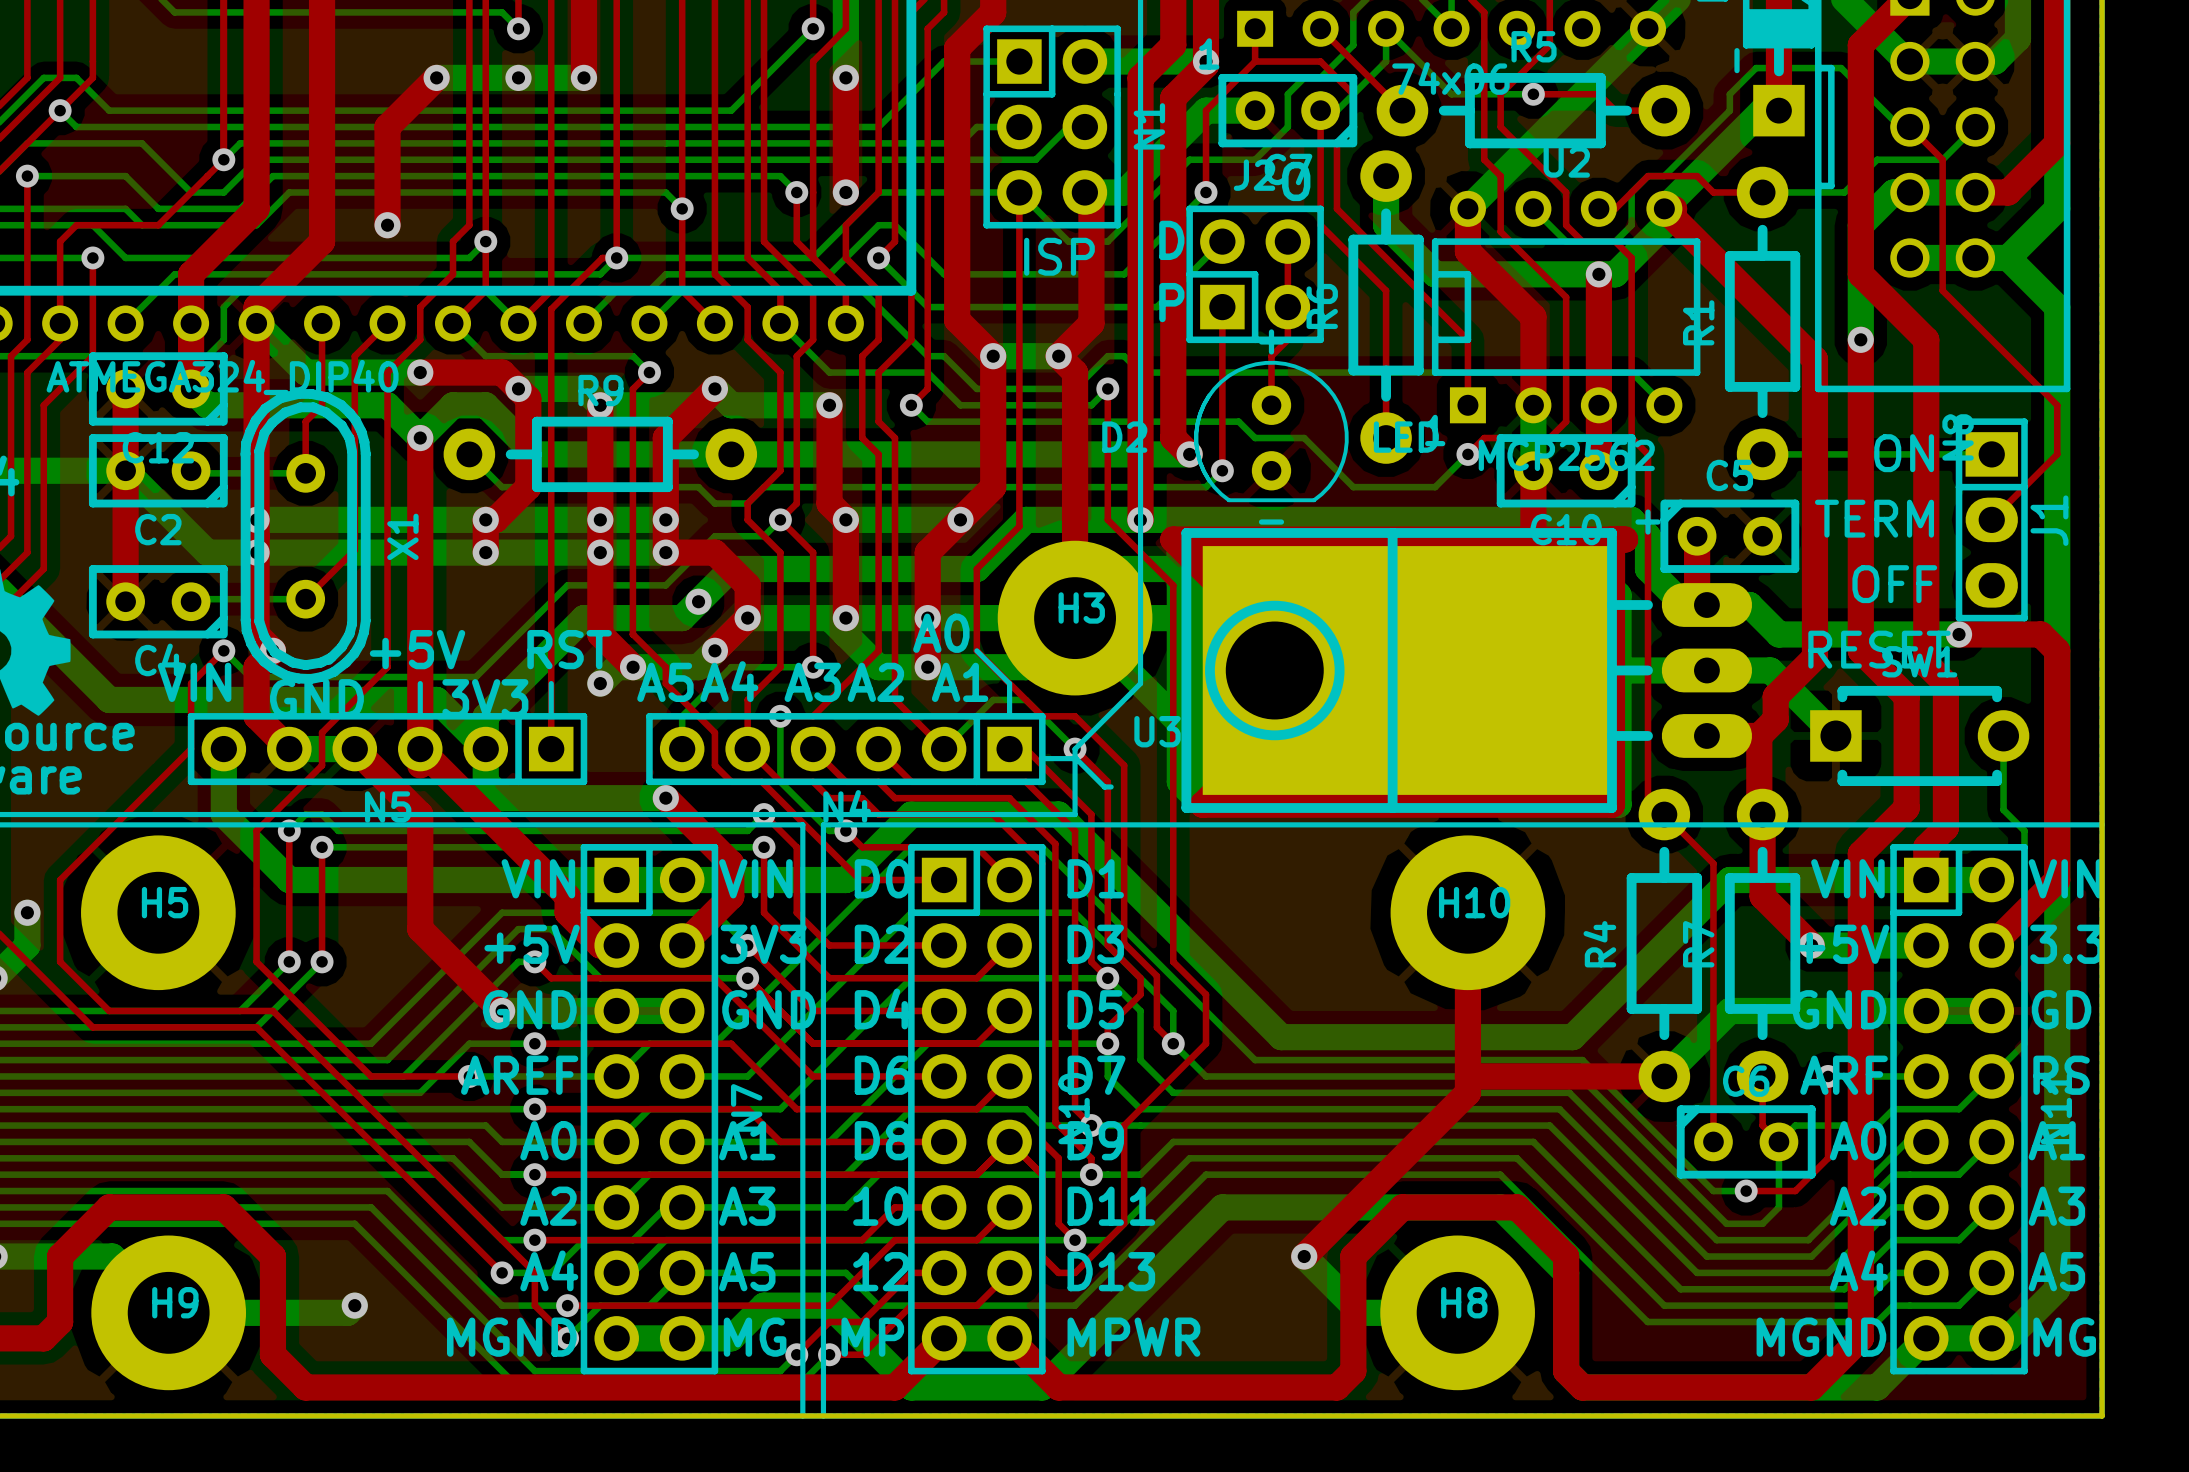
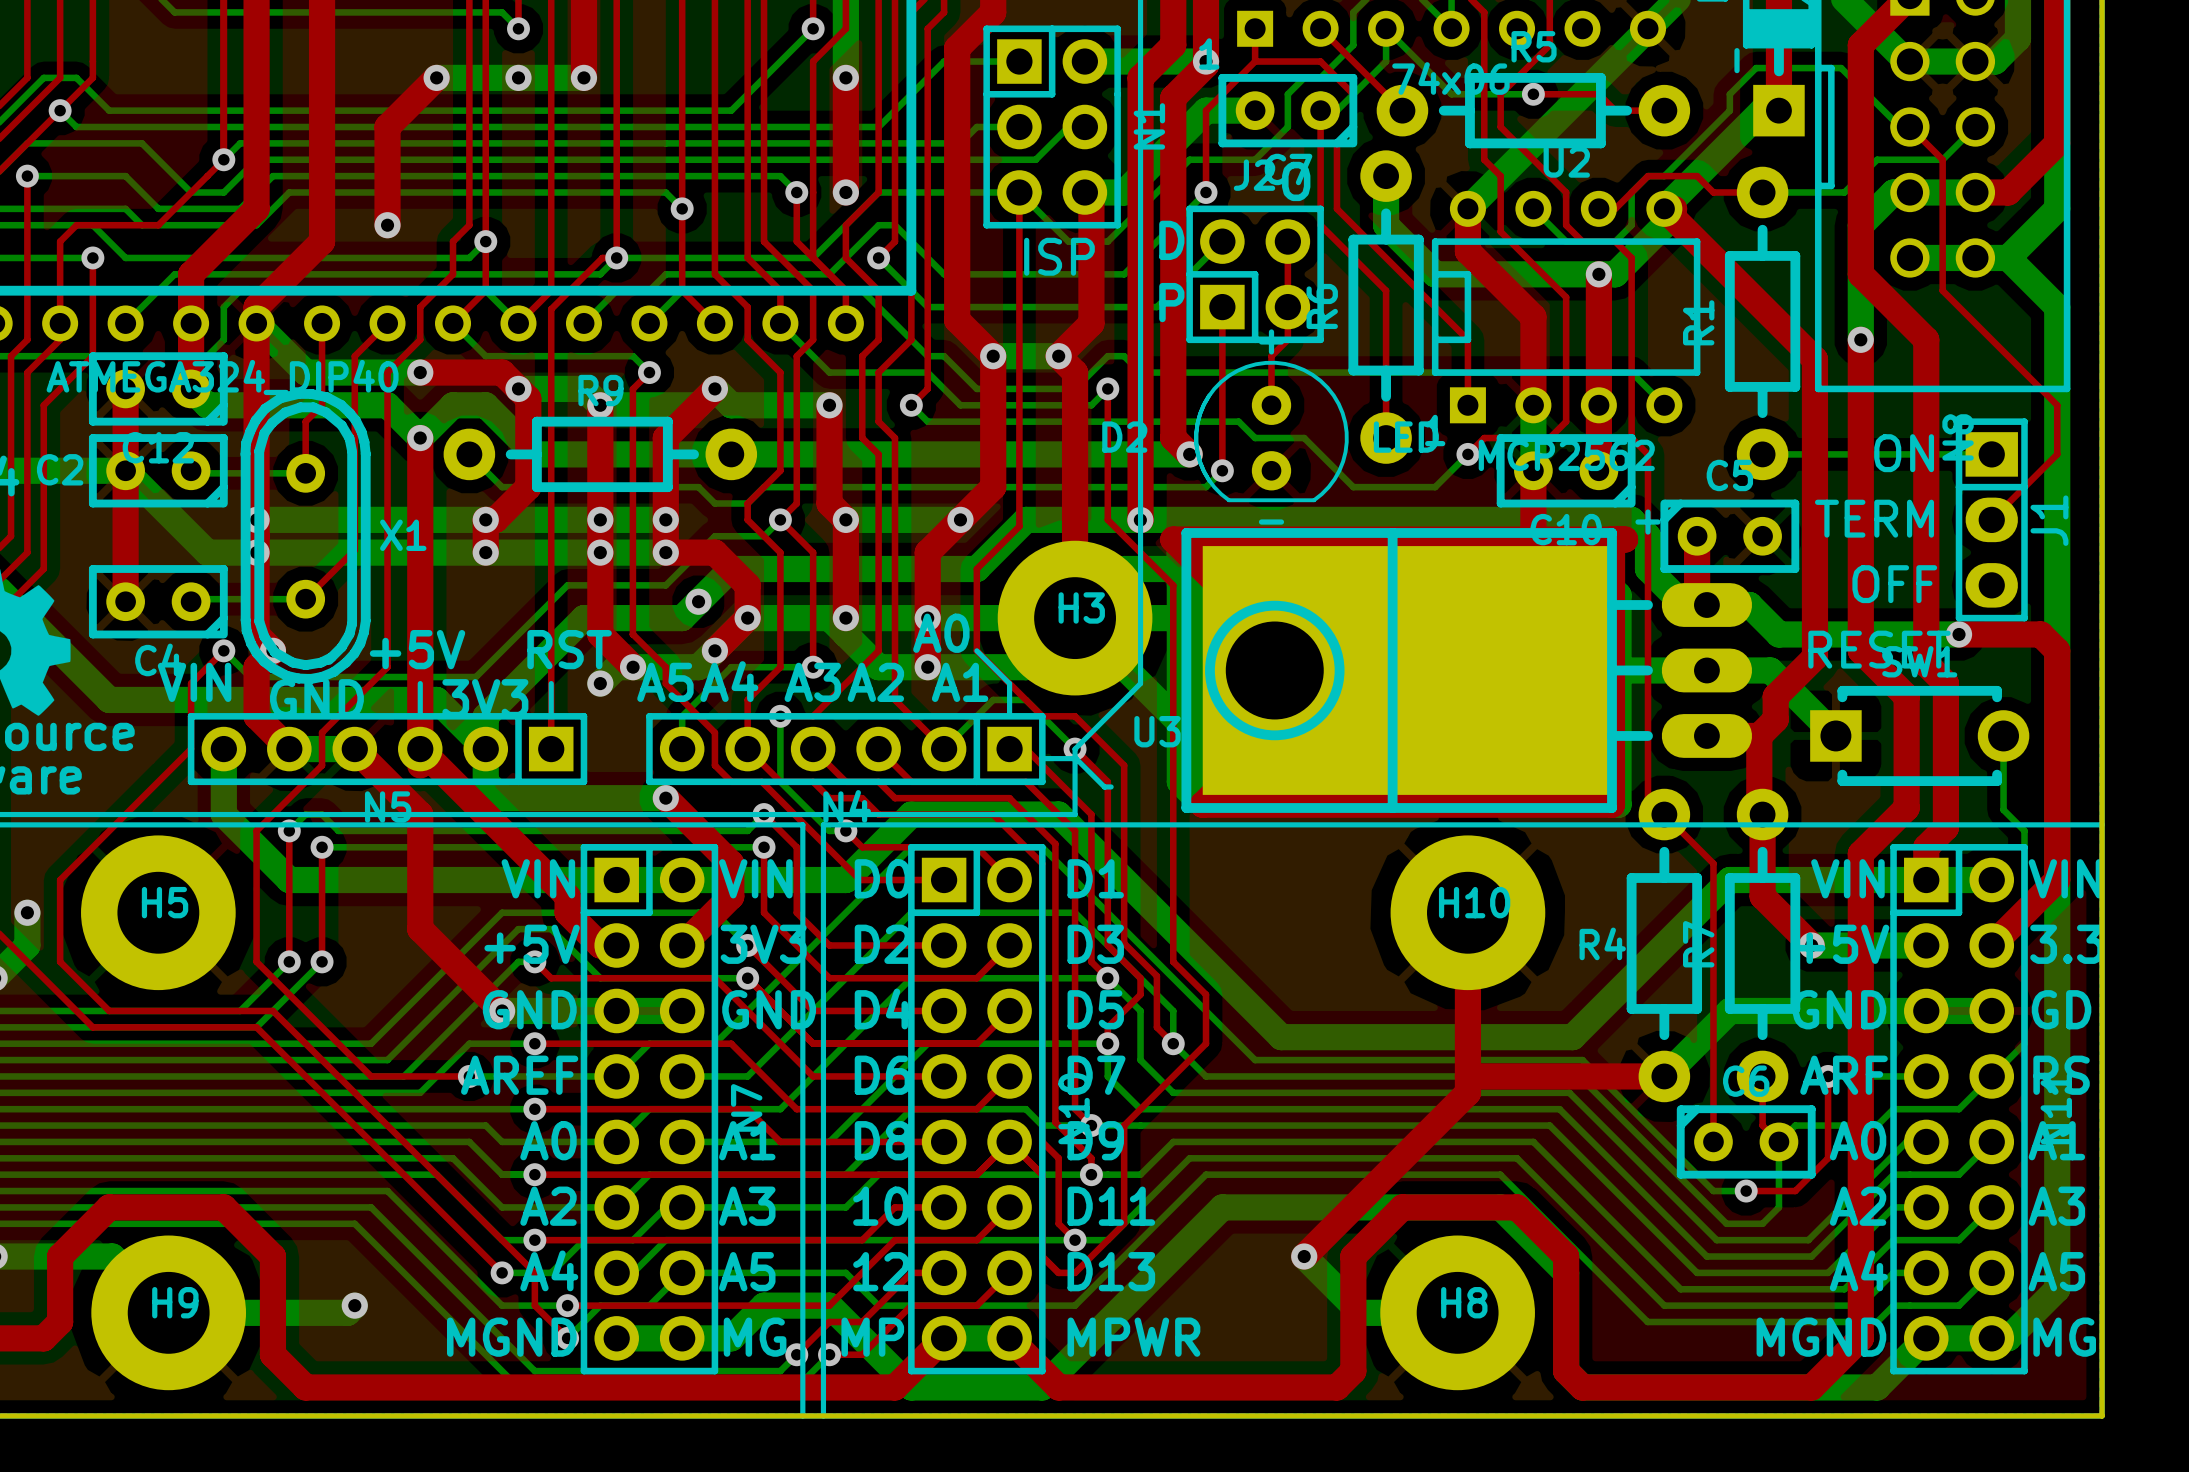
C2 name position: C2 (158, 529) -> C2 (60, 469)
X1 name rotation: 0° (402, 536) -> 90° clockwise (403, 535)
R4 name rotation: 0° (1599, 944) -> 90° clockwise (1602, 943)

